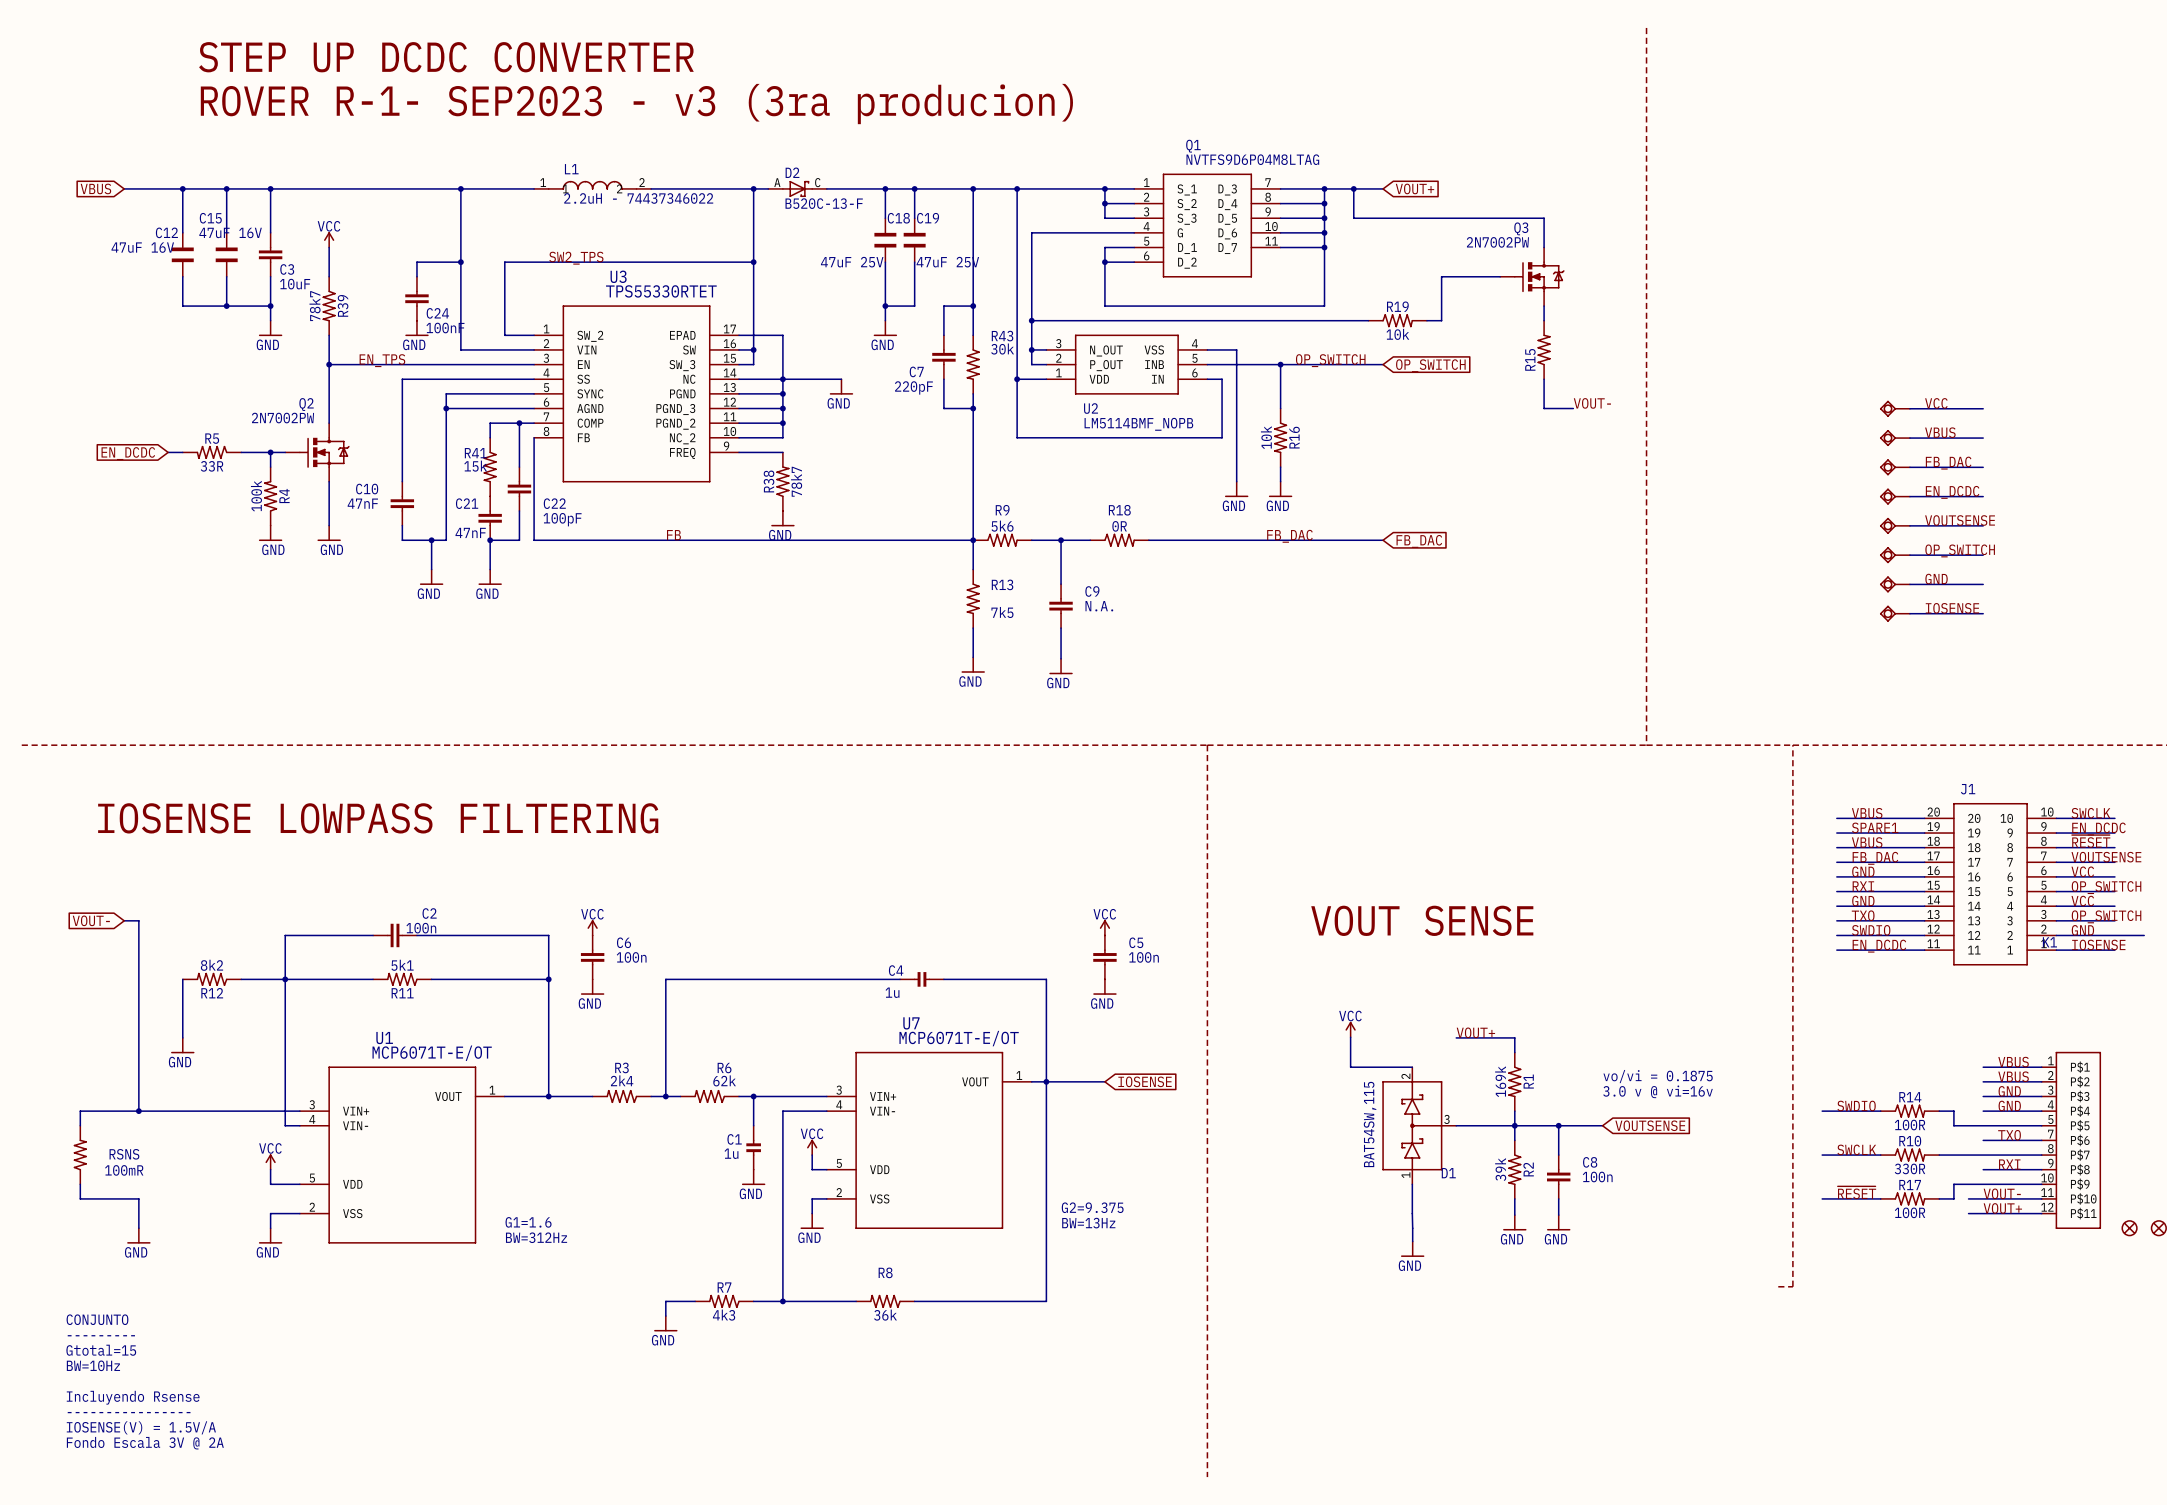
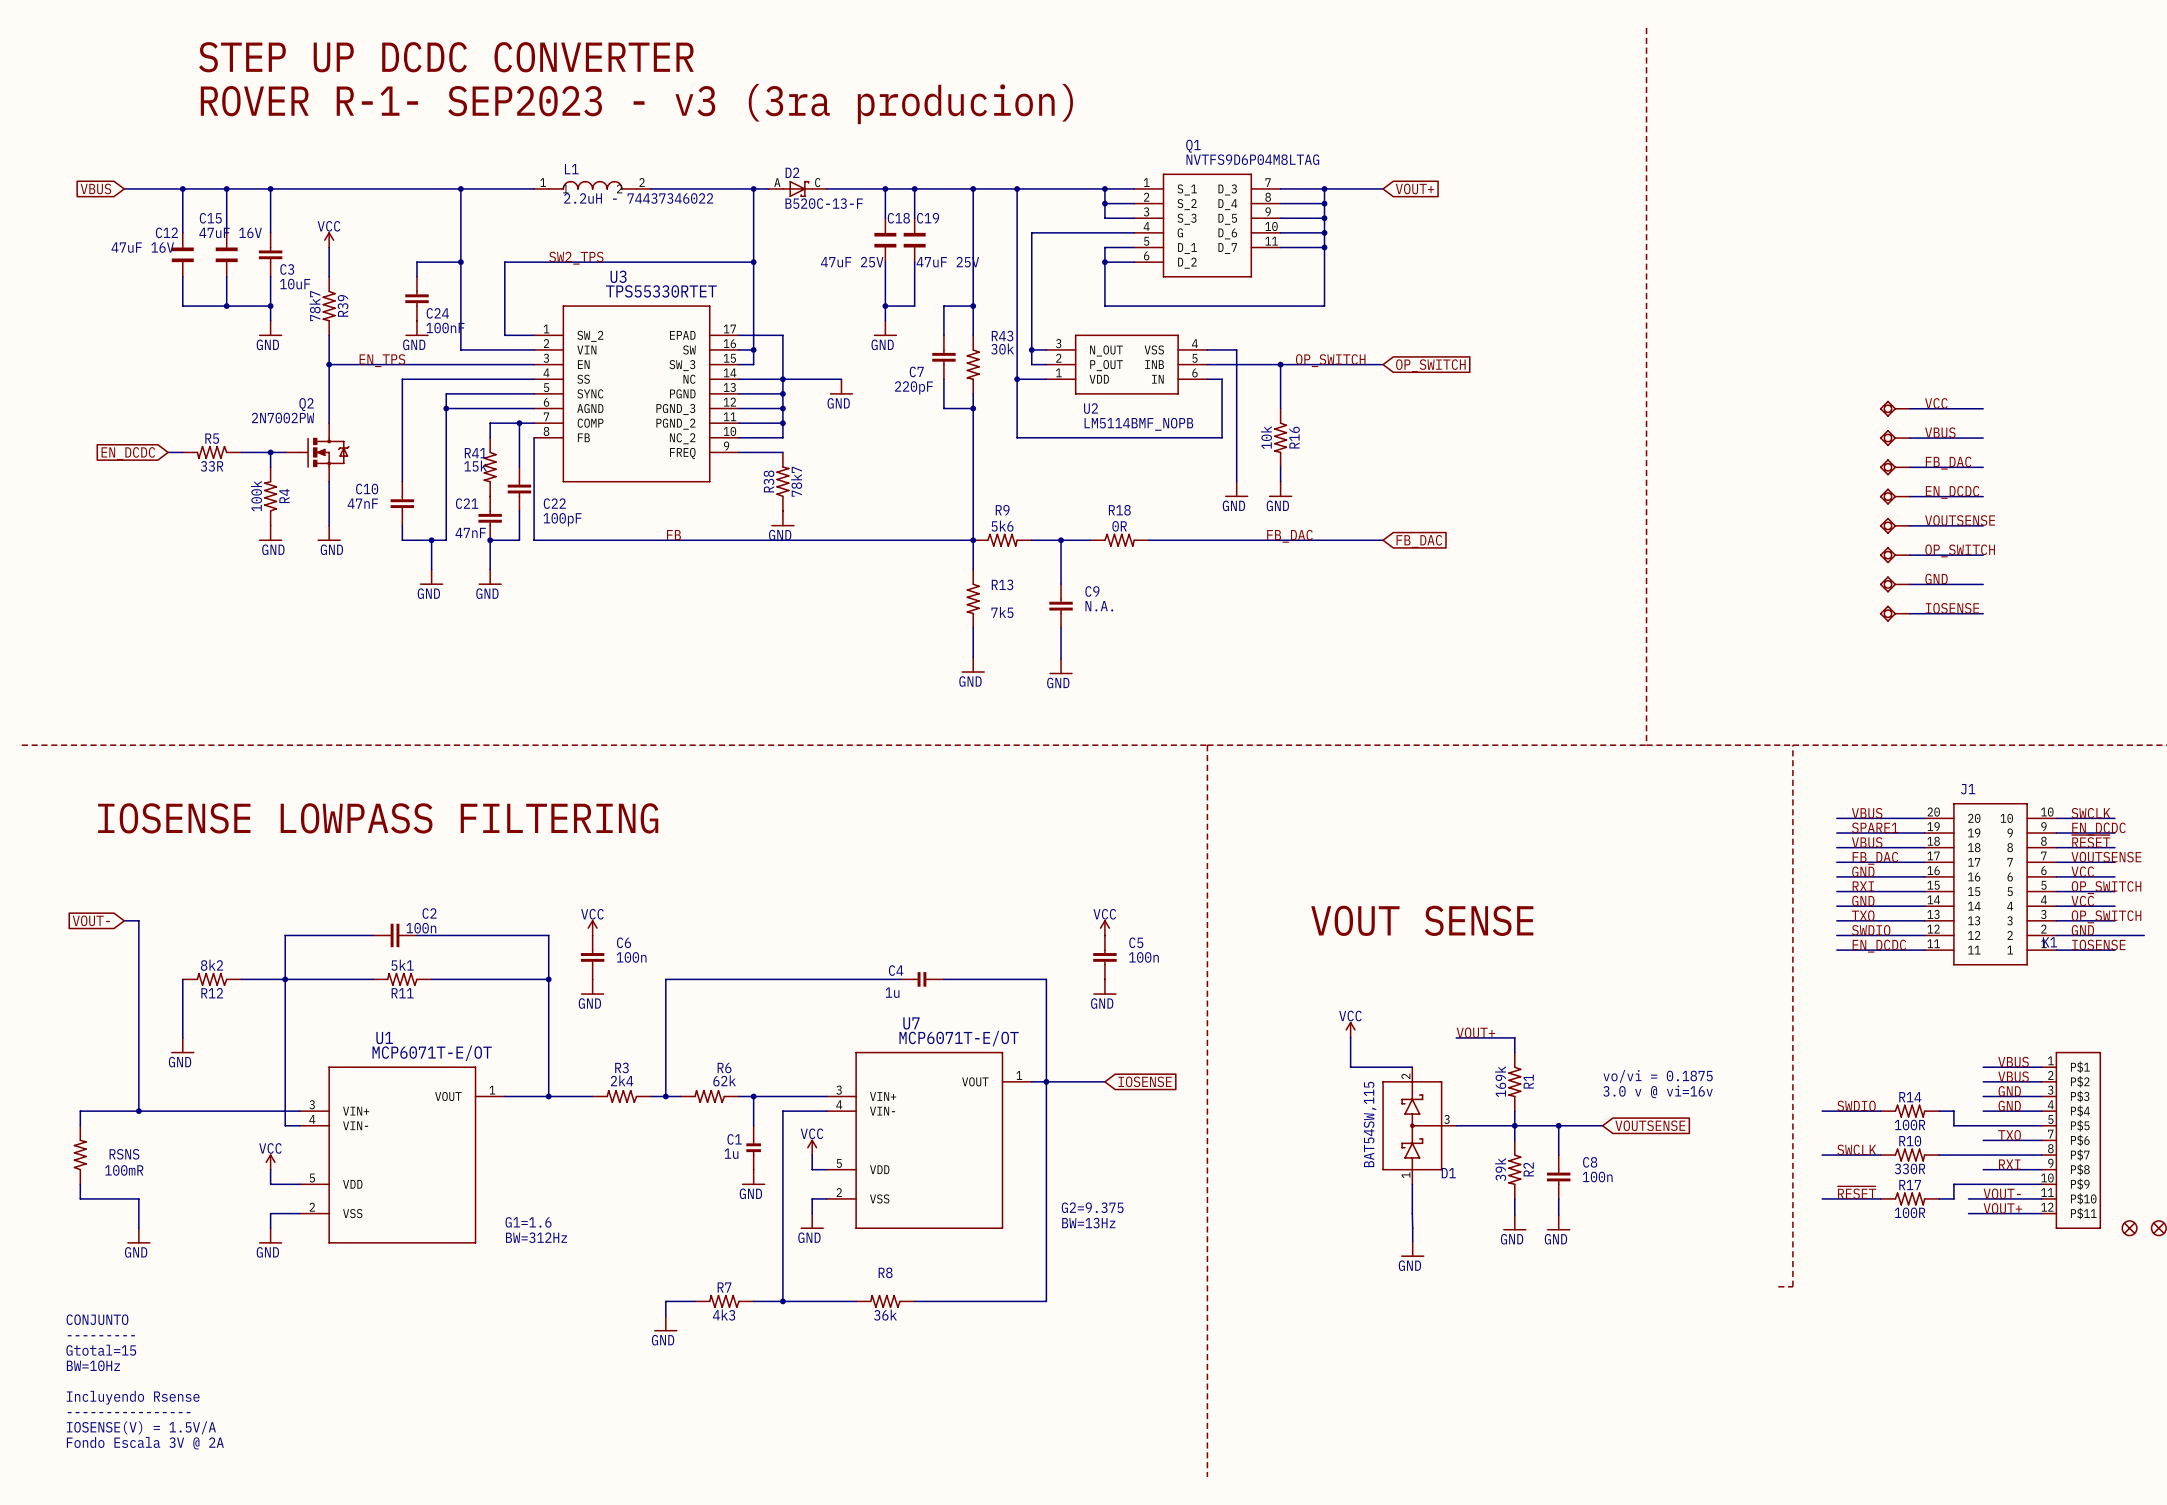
wire: (1353, 188) (1353, 218) (1544, 218) (1544, 247) -> none
junction: (1353, 188) -> none
wire: (1500, 276) (1441, 276) (1441, 320) (1426, 320) -> none
Q3: 2N7002PW (1532, 276) -> none
wire: (1544, 306) (1544, 320) -> none
wire: (1031, 320) (1368, 320) -> none
junction: (1031, 320) -> none
R19: 10k (1397, 320) -> none
R15: (1544, 349) -> none
wire: (1544, 379) (1544, 408) (1573, 408) -> none
label: VOUT- (1592, 403) -> none

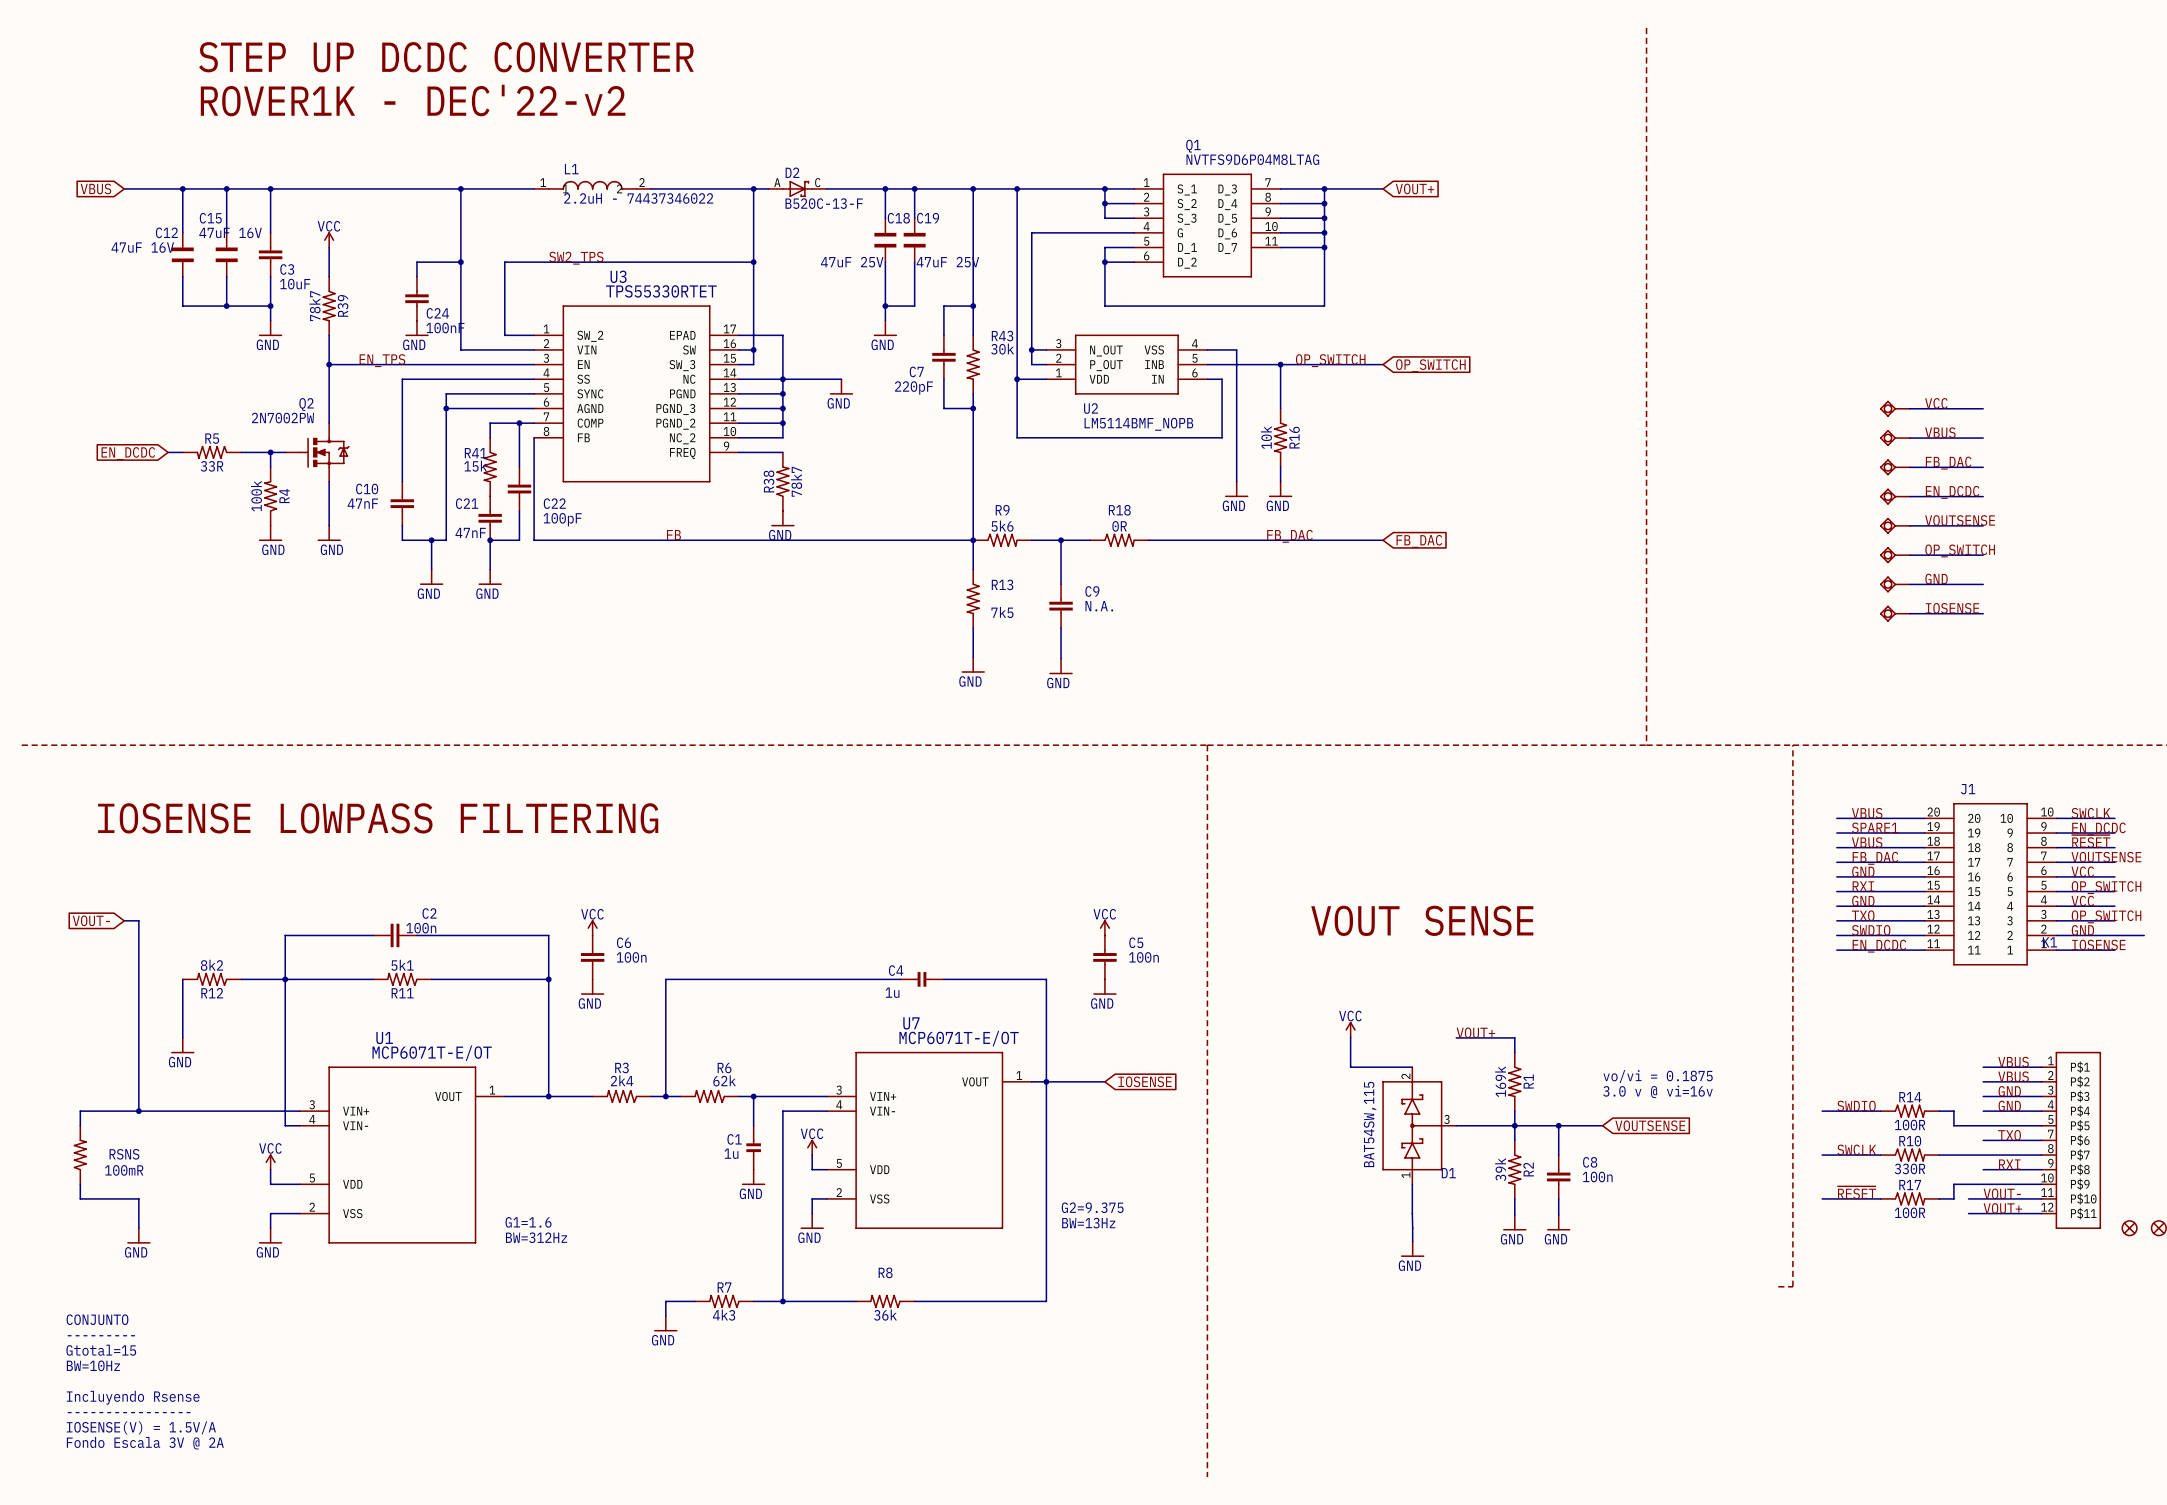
text: ROVER R-1- SEP2023 - v3 (3ra producion) (636, 104) -> ROVER1K - DEC'22-v2 (413, 100)

